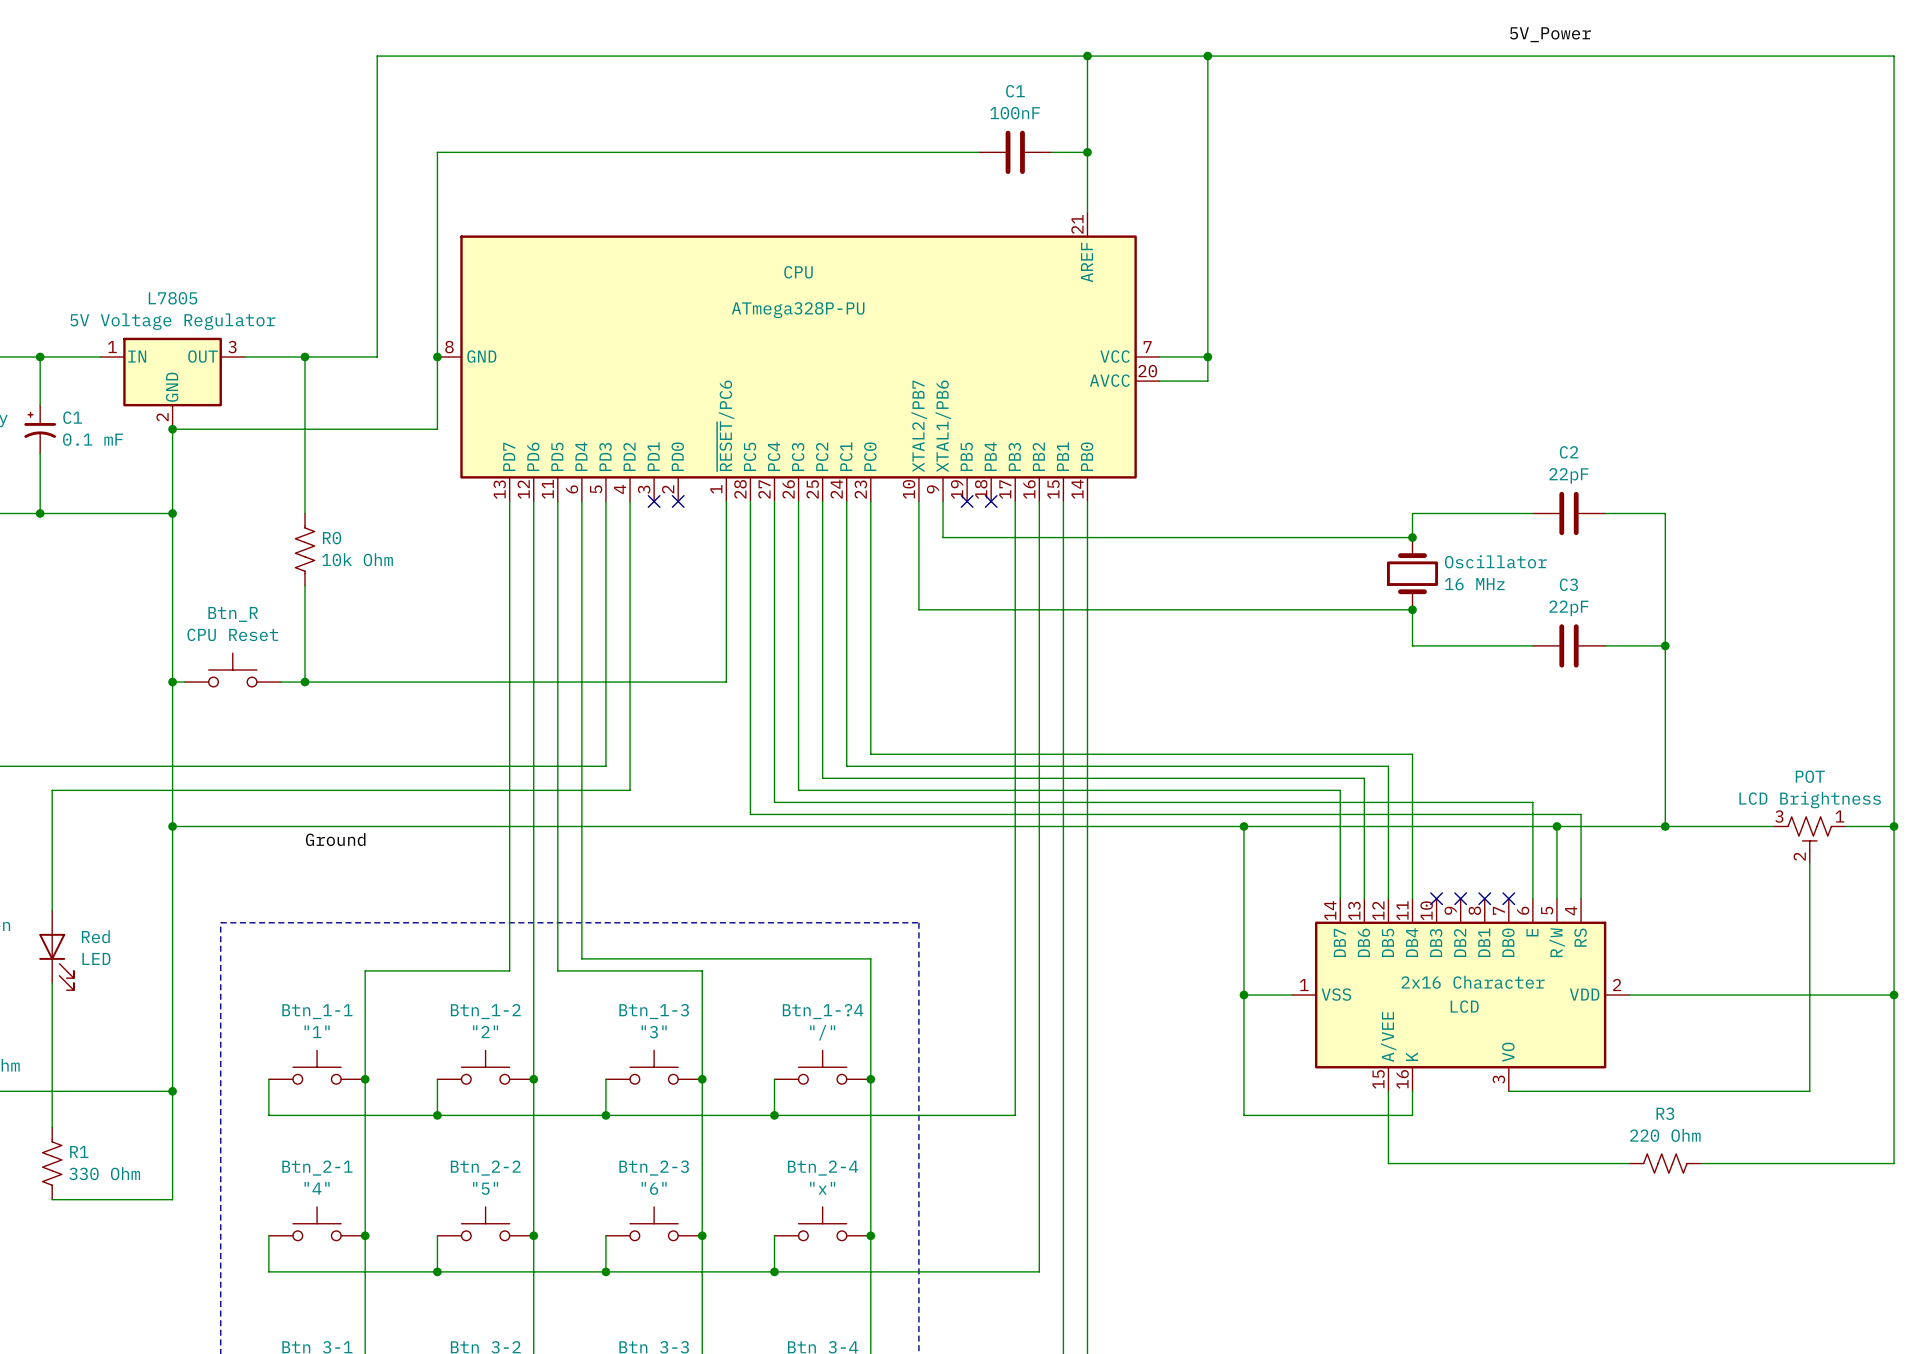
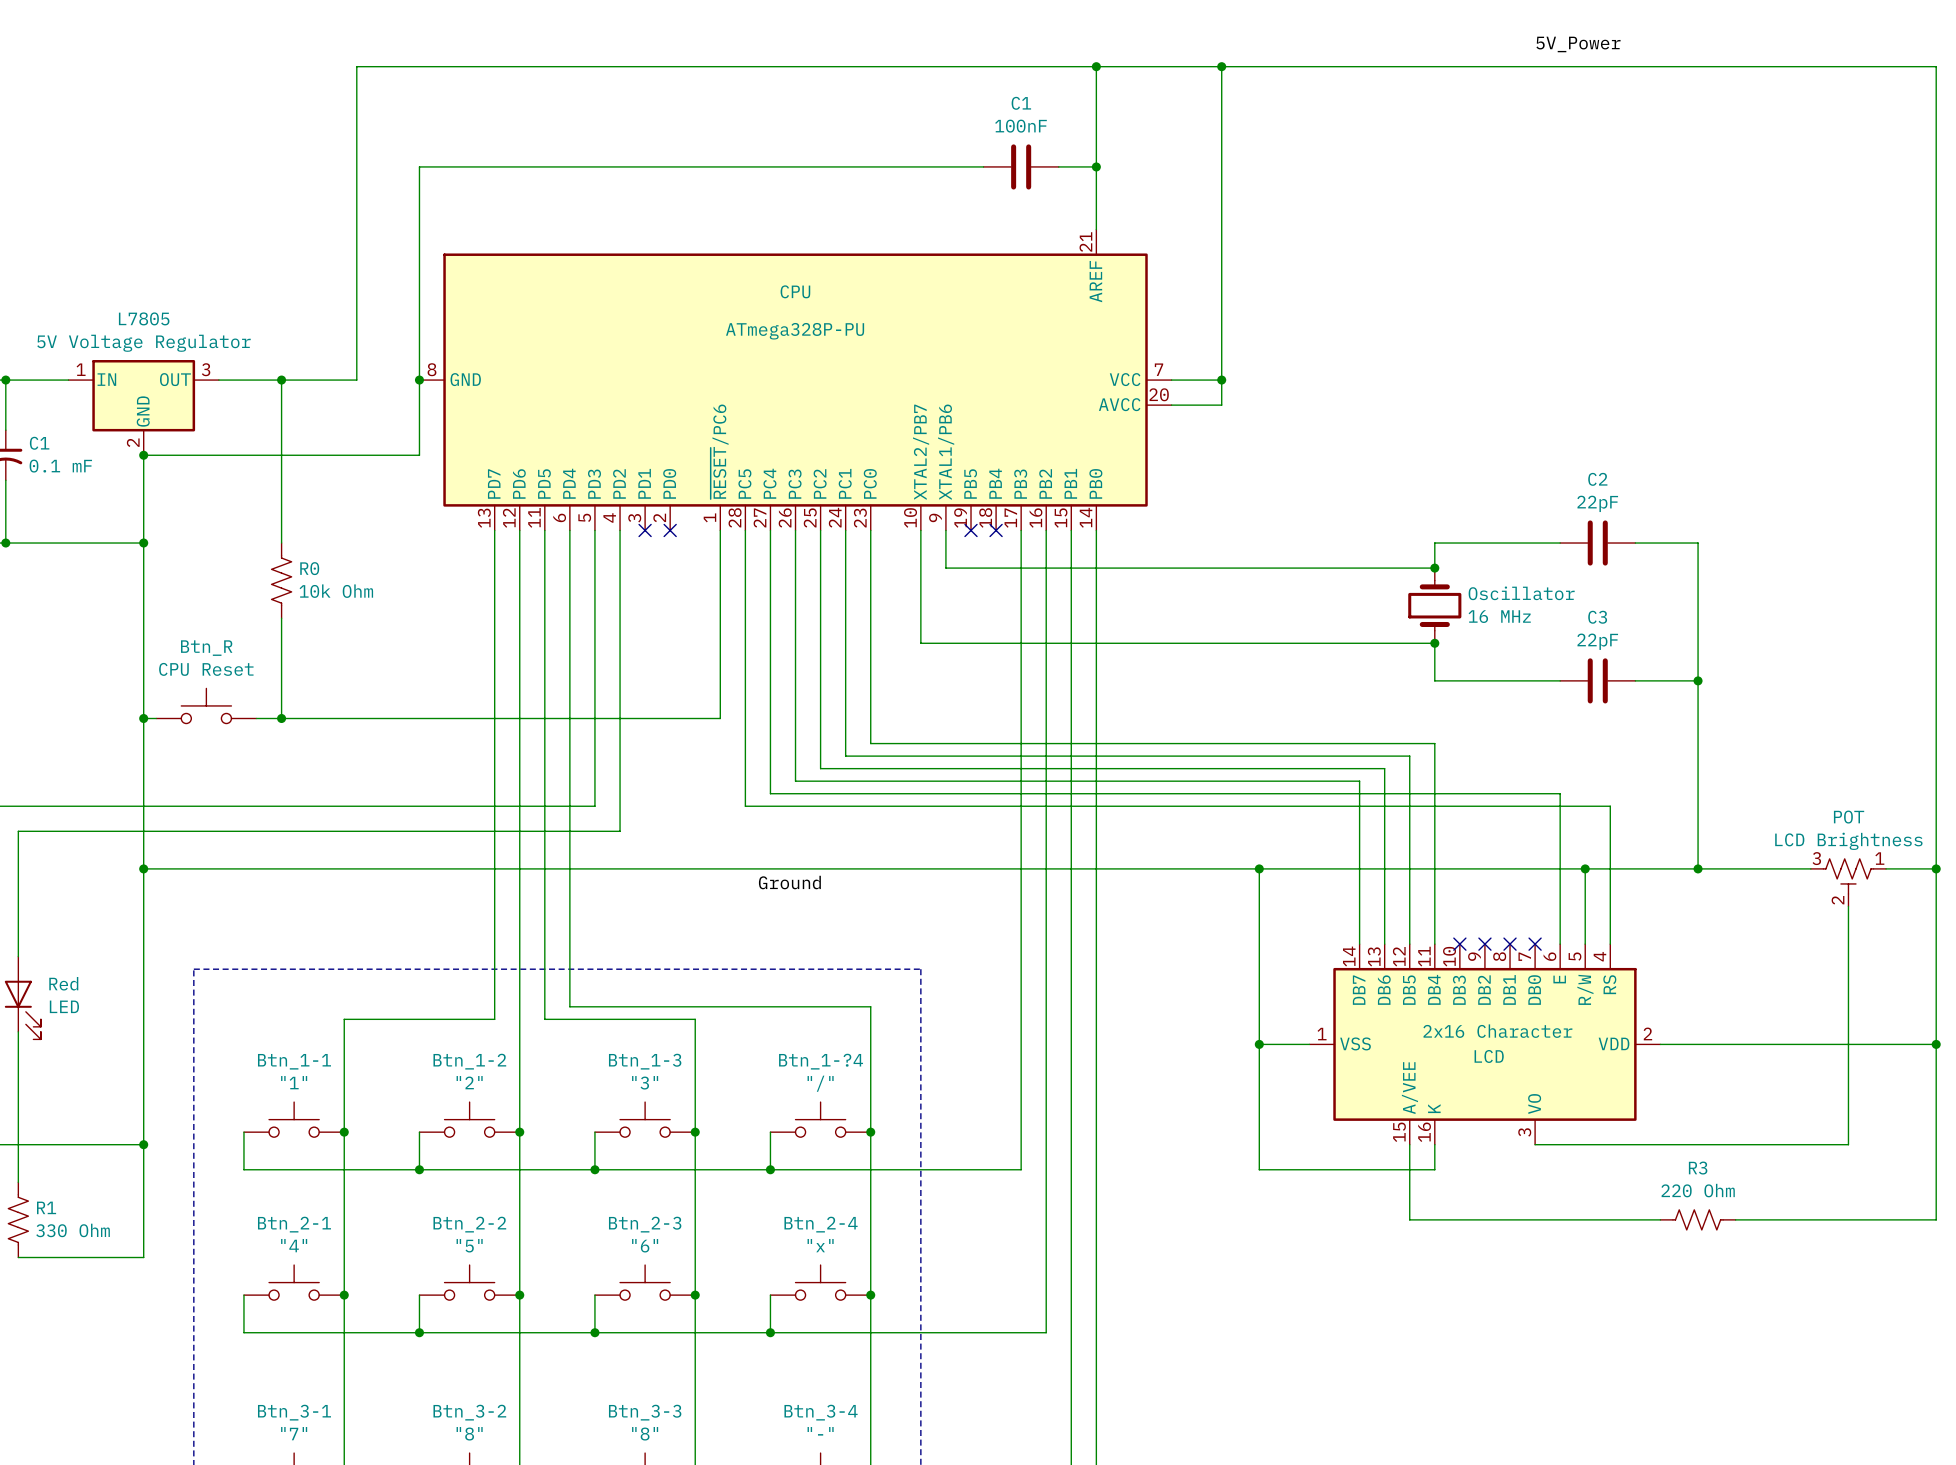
wire: (870, 706) (870, 754) -> (770, 793) (870, 793)
wire: (846, 718) (846, 766) -> (745, 806) (845, 806)
wire: (822, 730) (822, 778) (1364, 778) -> (820, 768) (1384, 768) (1384, 818)
wire: (798, 742) (798, 790) (1340, 790) -> (795, 781) (1359, 781) (1359, 831)
wire: (774, 754) (774, 802) (1532, 802) -> (870, 743) (1434, 743) (1434, 793) (1560, 793) (1560, 843)
wire: (750, 766) (750, 814) (1581, 814) -> (845, 756) (1409, 756) (1409, 806) (1610, 806) (1610, 856)
label: Ground (335, 839) -> none
label: none -> Ground (789, 882)

